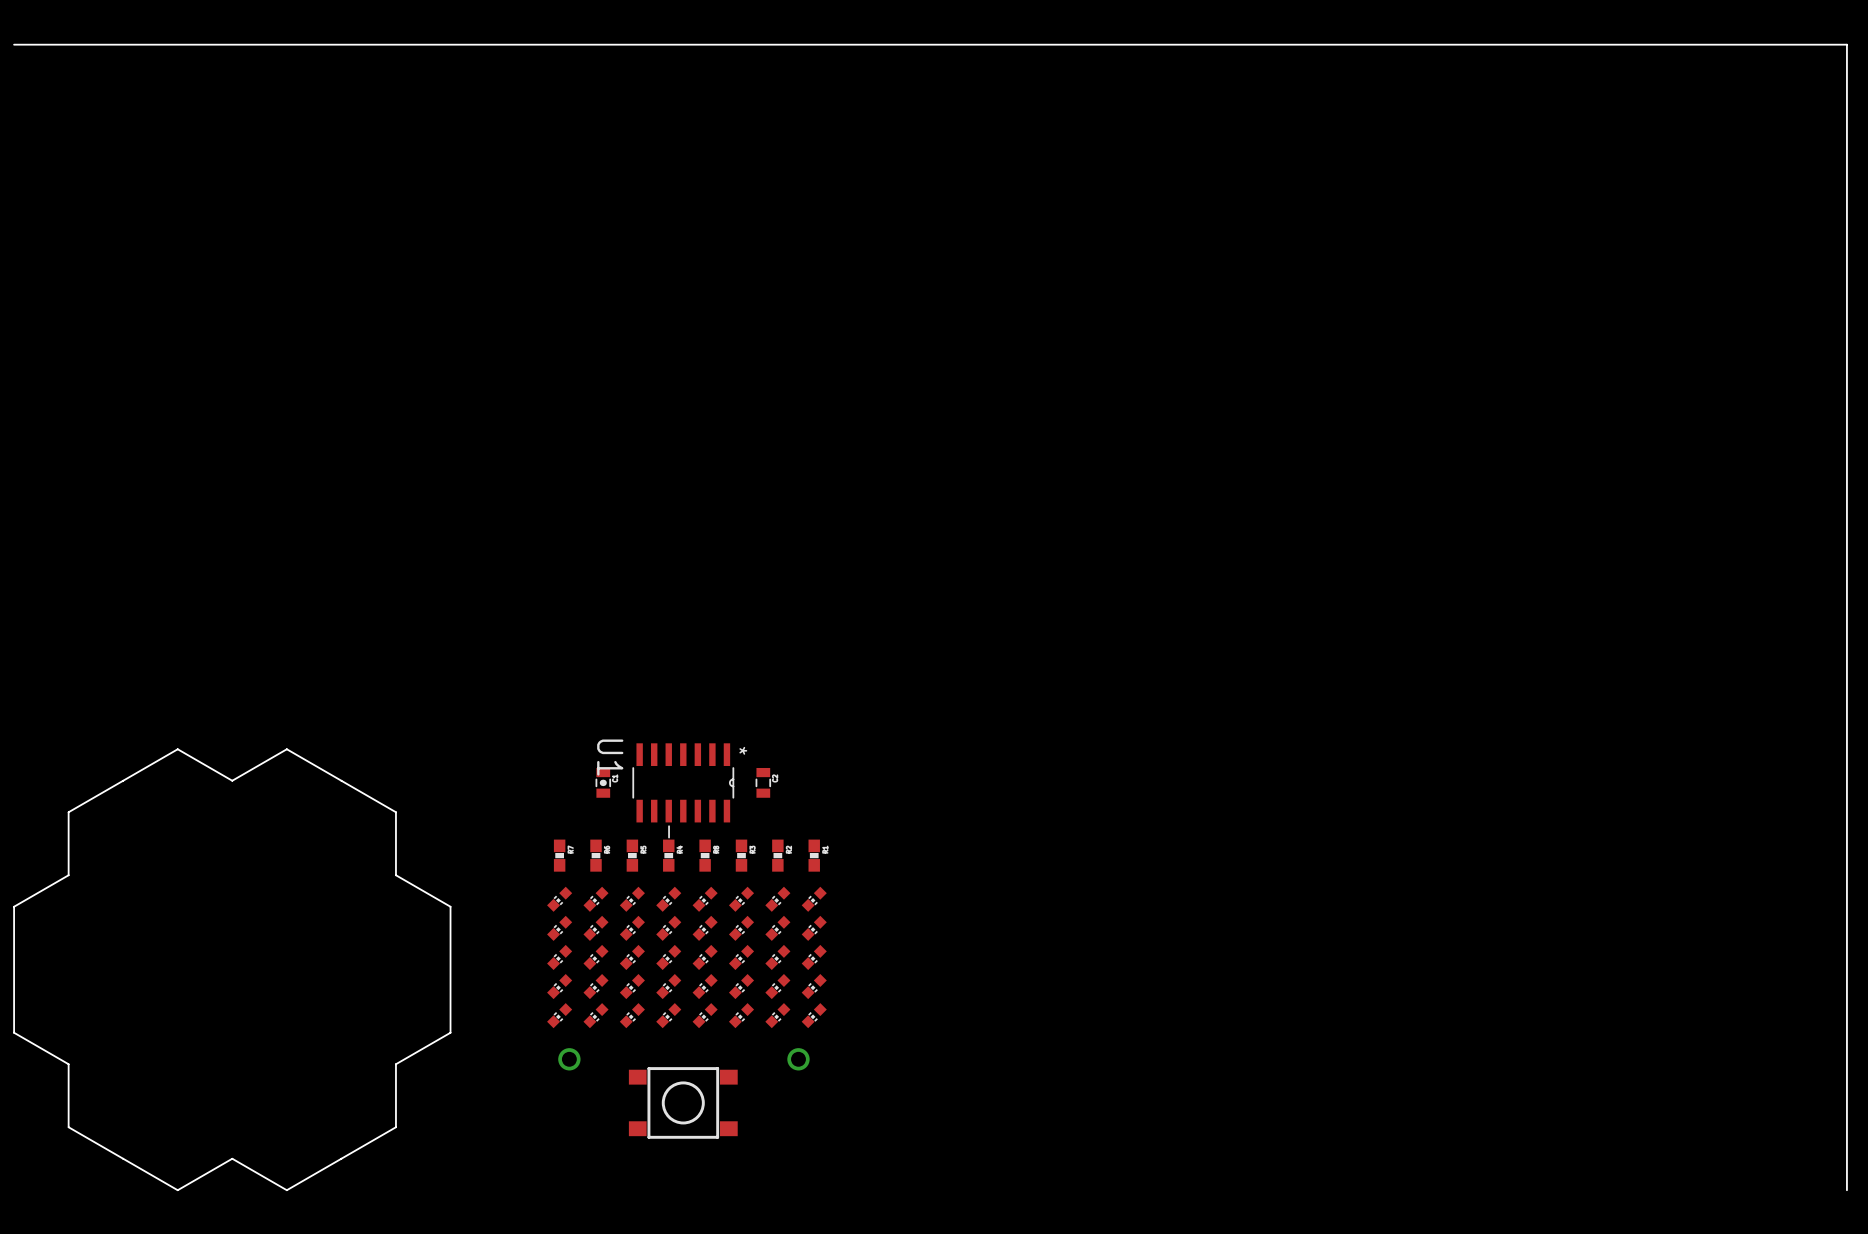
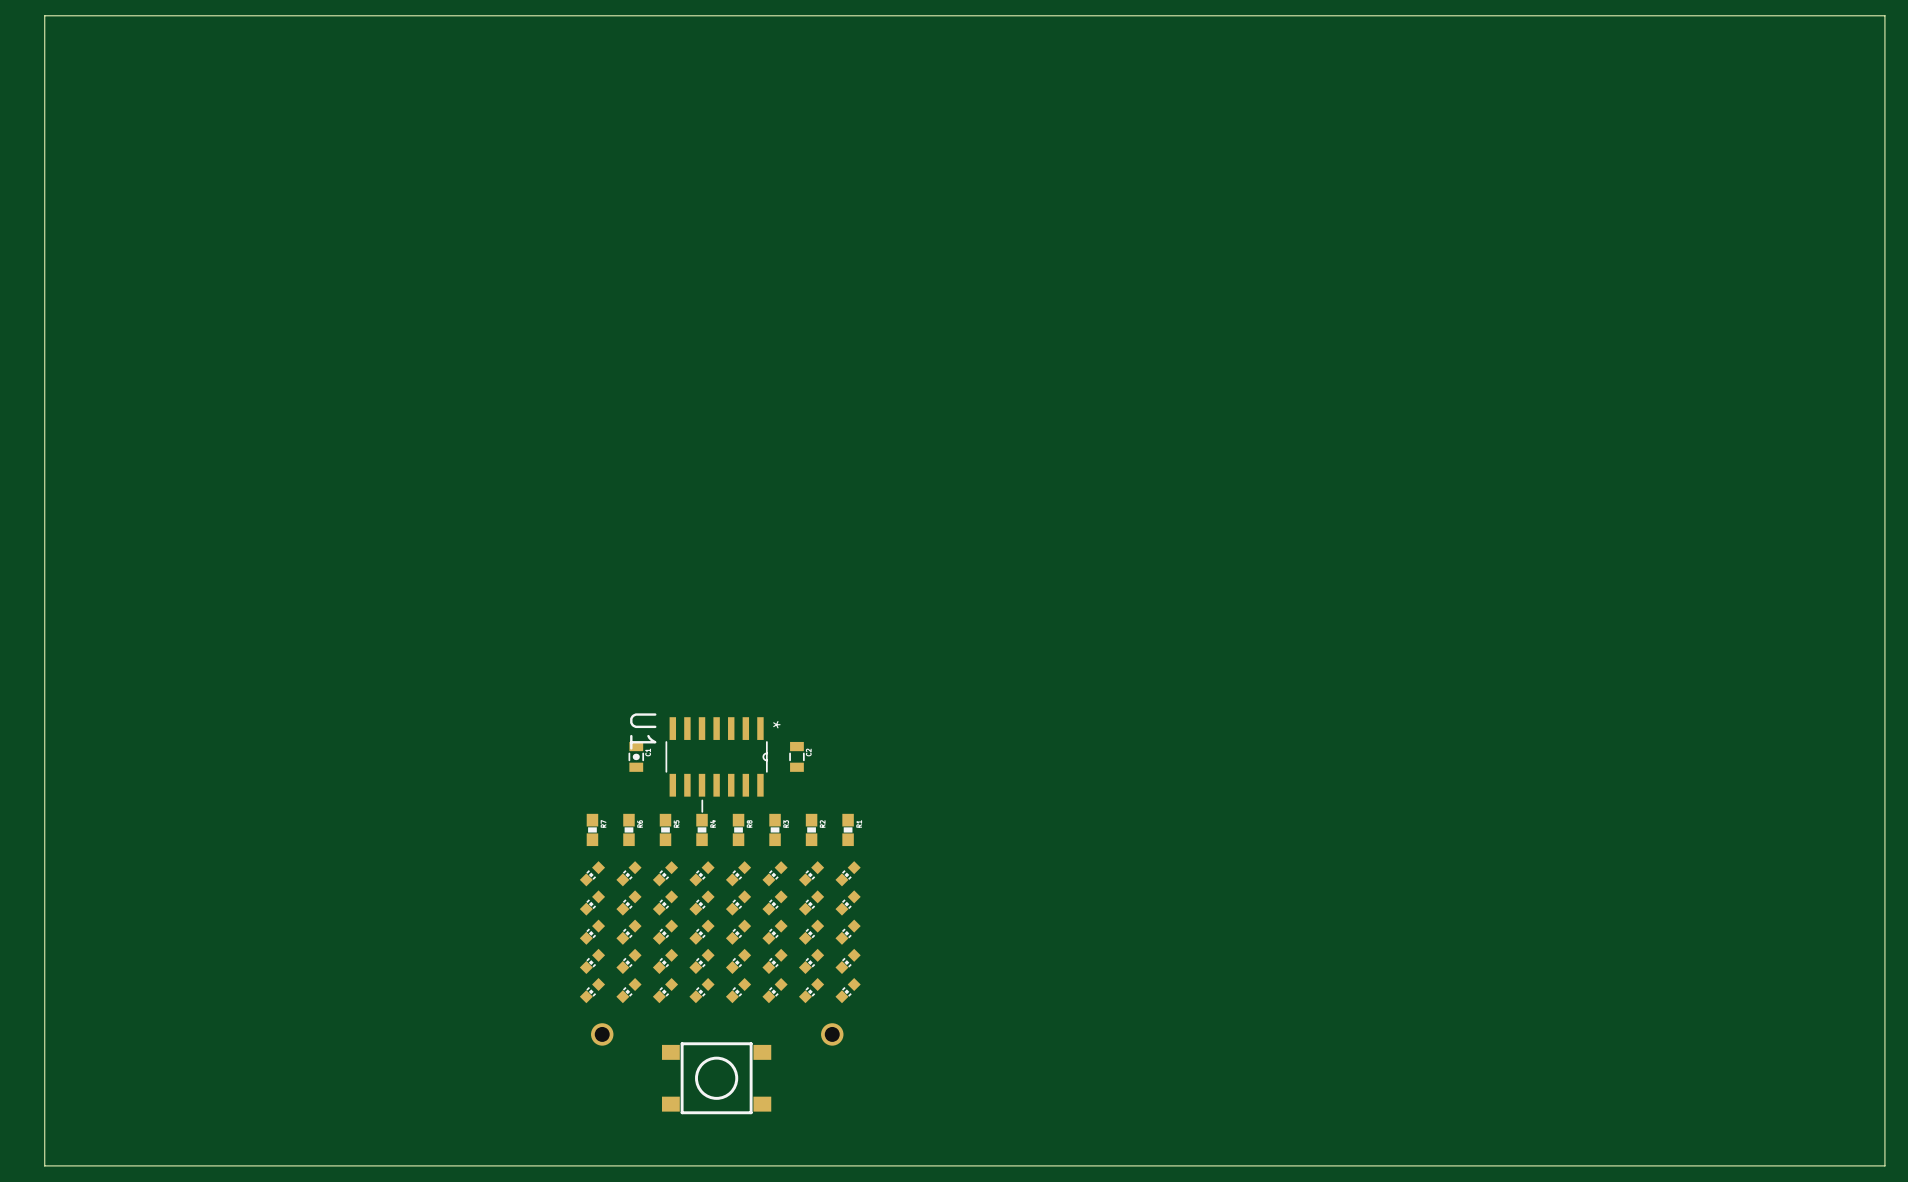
board edge: (14, 906) (68, 875) (68, 812) (177, 749) (232, 780) (286, 749) (395, 812) (395, 875) (450, 906) (450, 1032) (395, 1064) (395, 1127) (286, 1190) (232, 1158) (177, 1190) (68, 1127) (68, 1064) (14, 1032) -> (44, 881) (44, 15)
board edge: none -> (44, 1007) (44, 1165) (1884, 1165)

